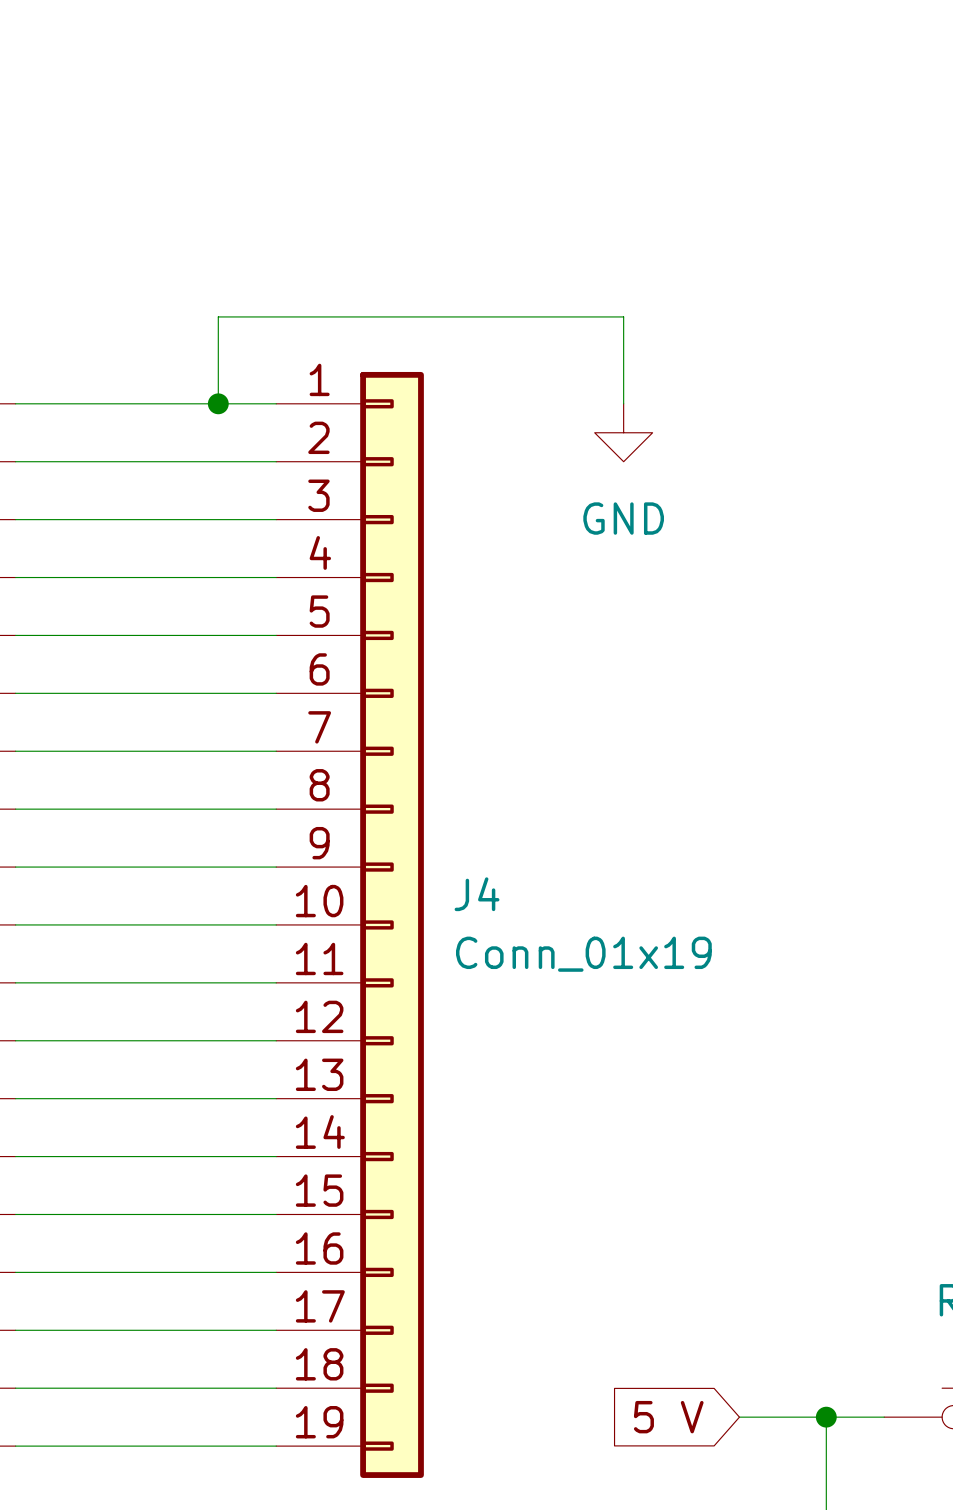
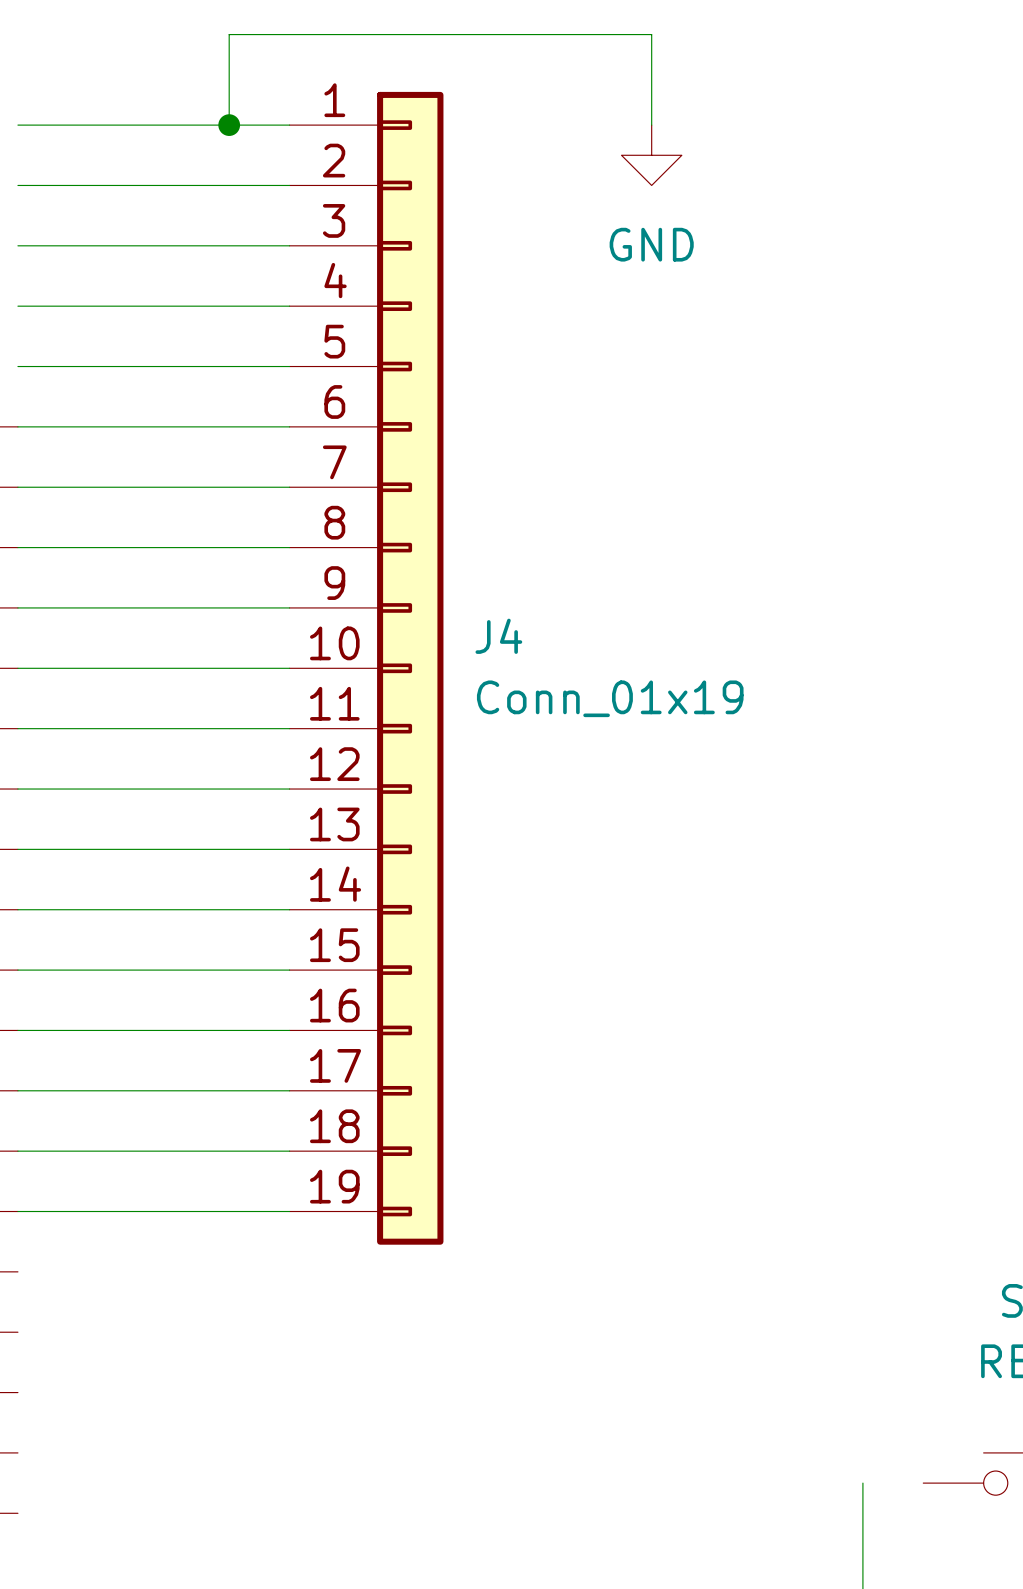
wire: none -> (17, 125) (289, 125)
junction: none -> (229, 125)
wire: none -> (17, 185) (289, 185)
wire: none -> (17, 245) (289, 245)
wire: none -> (17, 306) (289, 306)
wire: none -> (17, 366) (289, 366)
wire: (218, 403) (218, 316) (623, 316) (623, 403) -> (229, 125) (229, 34) (651, 34) (651, 125)
junction: (218, 403) -> none
power symbol position: GND (623, 432) -> GND (651, 155)
J4 position: (350, 924) -> (366, 668)
wire: (15, 1214) (276, 1214) -> none
wire: (15, 1272) (276, 1272) -> none
wire: (15, 1330) (276, 1330) -> none
wire: (15, 1388) (276, 1388) -> none
global label: 5 V (668, 1417) -> none
wire: (739, 1417) (884, 1417) -> none
junction: (826, 1417) -> none
wire: (15, 1446) (276, 1446) -> none

